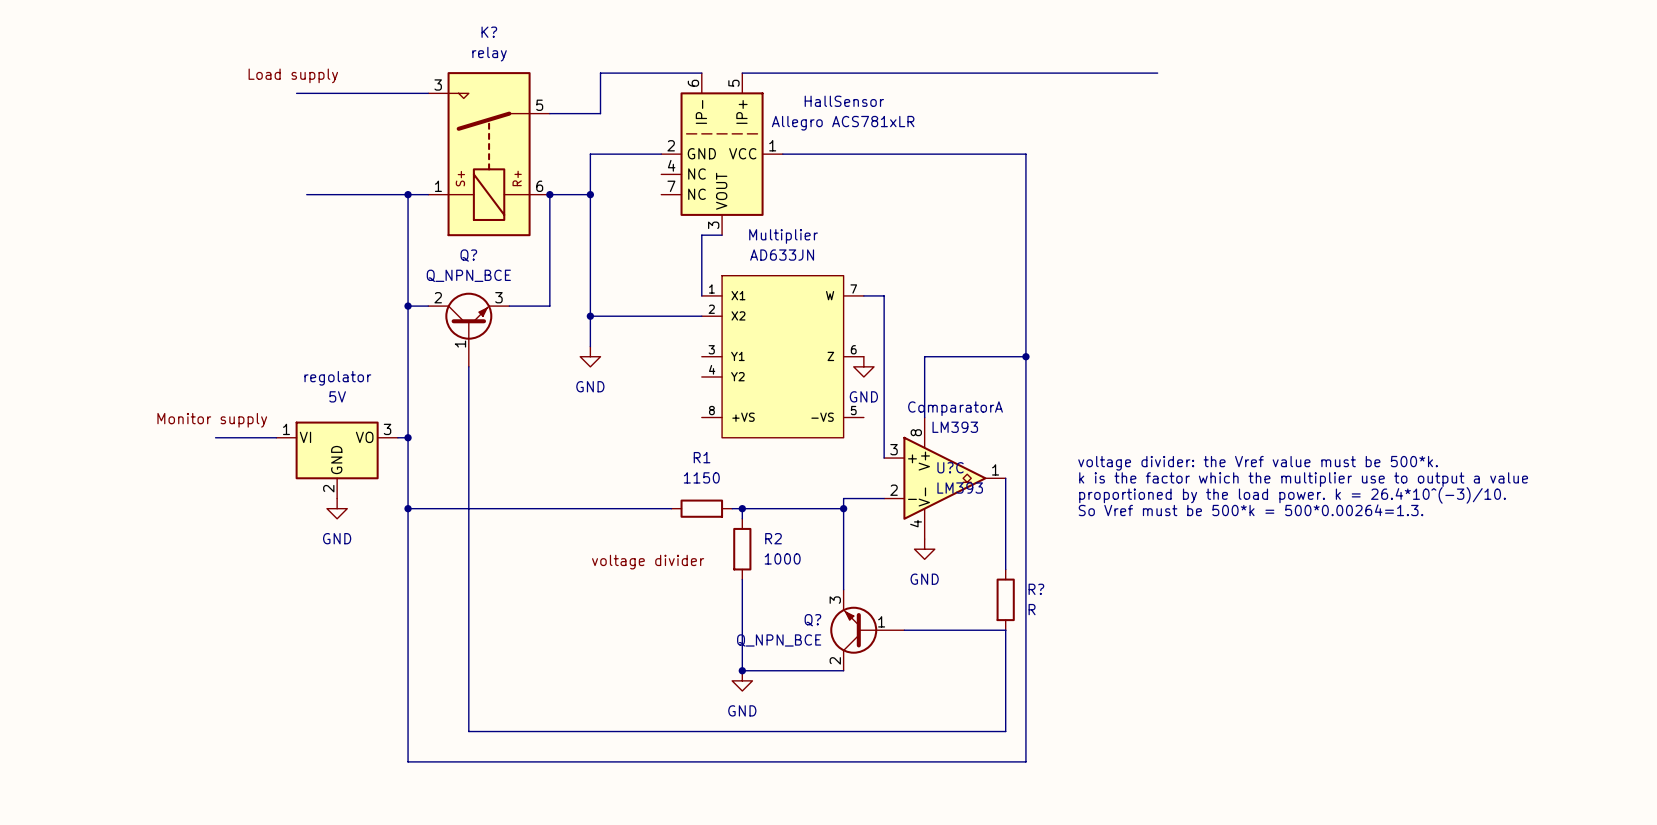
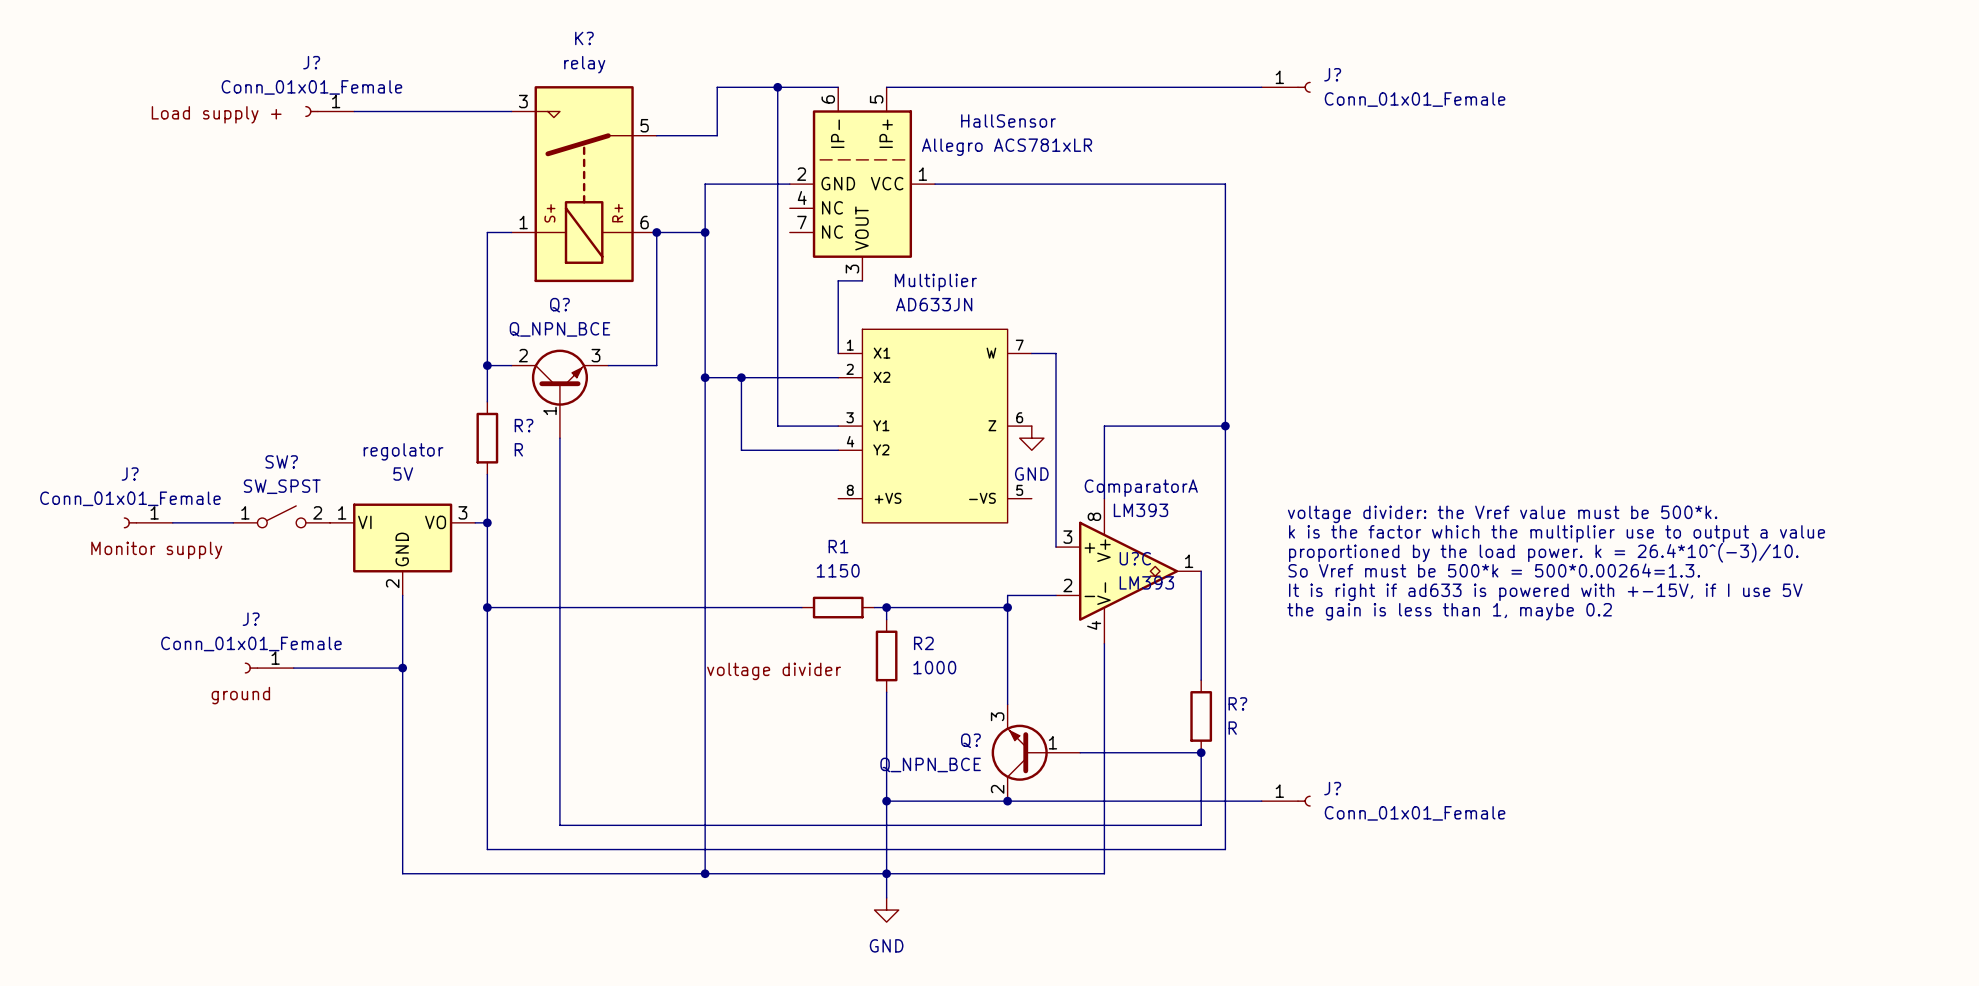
wire: none -> (777, 87) (777, 426) (838, 426)
junction: none -> (777, 87)
wire: (1056, 73) (1157, 73) -> none
J?: none -> Conn_01x01_Female (1286, 87)
label: Load supply (293, 75) -> Load supply + (216, 114)
J?: none -> Conn_01x01_Female (329, 111)
wire: (306, 194) (408, 194) -> none
junction: (408, 194) -> none
wire: none -> (741, 377) (741, 450) (838, 450)
junction: none -> (741, 377)
wire: (408, 336) (408, 397) -> none
wire: none -> (705, 413) (705, 873)
power symbol: GND (590, 356) -> none
R?: none -> R (487, 438)
label position: Monitor supply (212, 420) -> Monitor supply (156, 550)
text: none -> voltage divider: the Vref value must be 500*k. (1502, 514)
SW?: none -> SW_SPST (281, 516)
J?: none -> Conn_01x01_Female (148, 522)
wire: none -> (172, 522) (233, 522)
wire: (215, 437) (276, 437) -> none
text: none -> k is the factor which the multiplier use to output a value (1557, 533)
text: voltage divider: the Vref value must be 500*k. (1258, 463) -> proportioned by the load power. k = 26.4*10^(-3)/10. (1543, 552)
text: k is the factor which the multiplier use to output a value (1303, 479) -> So Vref must be 500*k = 500*0.00264=1.3. (1494, 570)
text: proportioned by the load power. k = 26.4*10^(-3)/10. (1292, 495) -> It is right if ad633 is powered with +-15V, if I use 5V (1545, 592)
power symbol: GND (337, 508) -> none
text: So Vref must be 500*k = 500*0.00264=1.3. (1251, 510) -> the gain is less than 1, maybe 0.2 (1449, 611)
power symbol: GND (924, 549) -> none
J?: none -> Conn_01x01_Female (269, 668)
wire: none -> (293, 668) (402, 668)
junction: none -> (402, 668)
label: none -> ground (240, 695)
junction: none -> (1201, 752)
wire: none -> (886, 801) (886, 897)
wire: none -> (1007, 801) (1261, 801)
junction: none -> (1007, 801)
J?: none -> Conn_01x01_Female (1286, 801)
power symbol position: GND (742, 680) -> GND (886, 910)
wire: (468, 691) (468, 731) -> (402, 595) (402, 873) (559, 873)
wire: none -> (559, 825) (1201, 825)
wire: (1005, 691) (1005, 731) (924, 731) -> (1104, 643) (1104, 873)
wire: (408, 711) (408, 761) (1025, 761) (1025, 711) -> (487, 849) (1225, 849)
junction: none -> (705, 873)
junction: none -> (886, 873)

